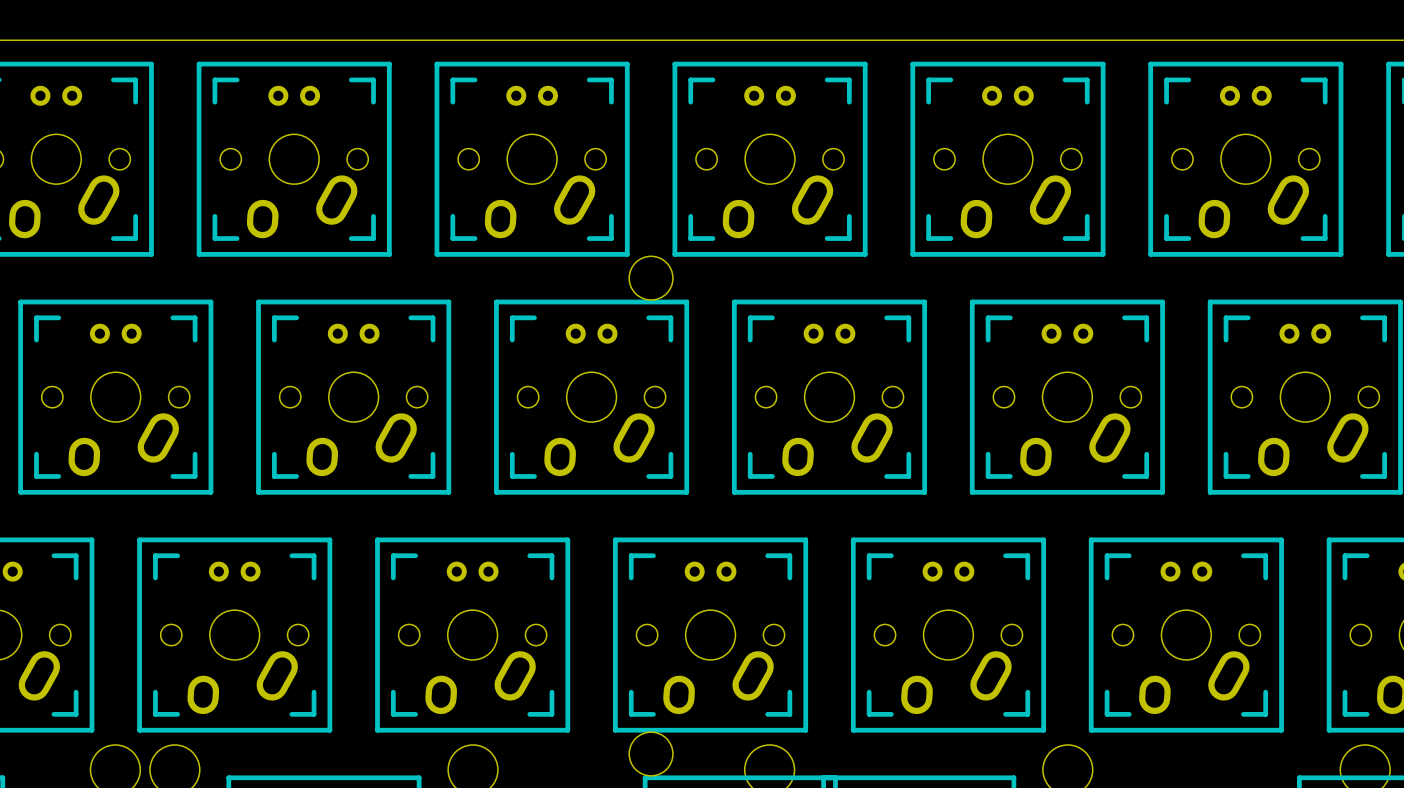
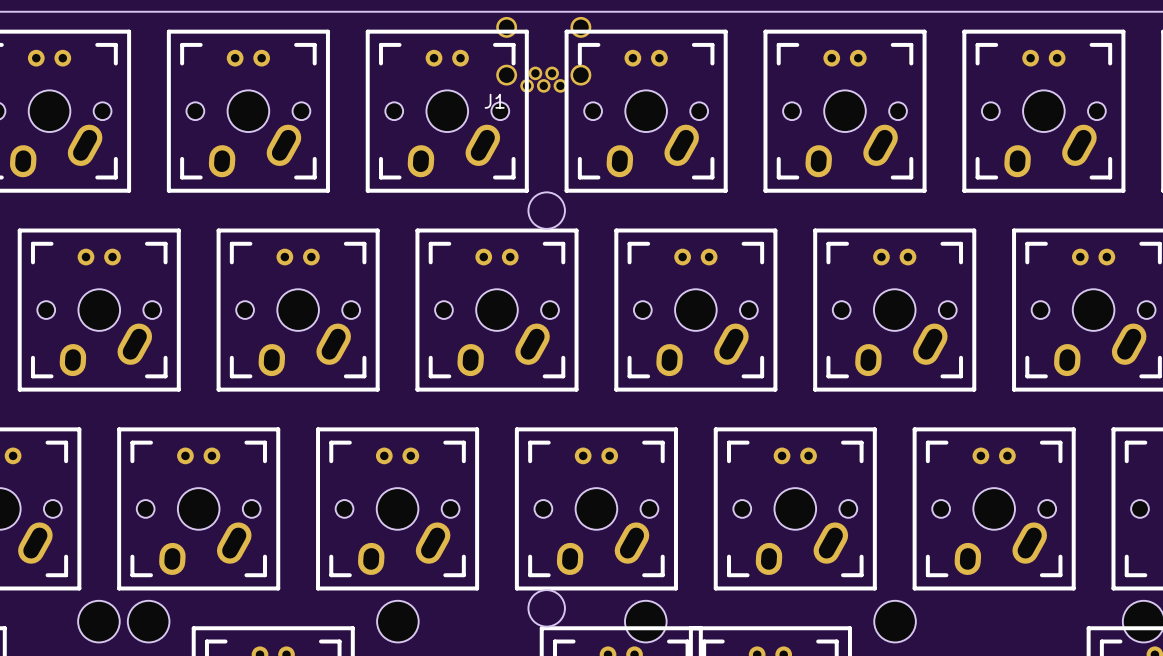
J1: none -> (543, 54)

